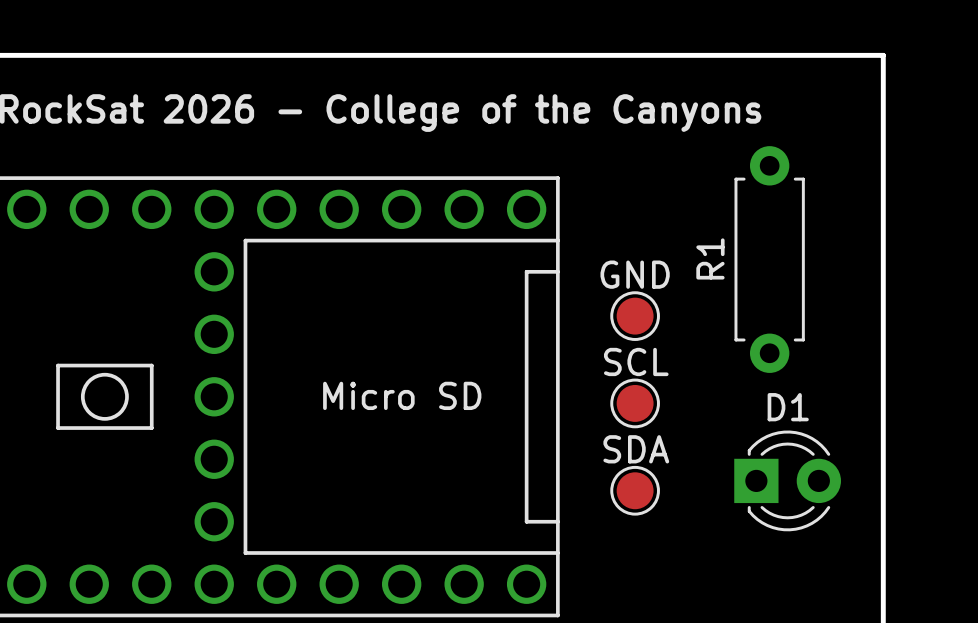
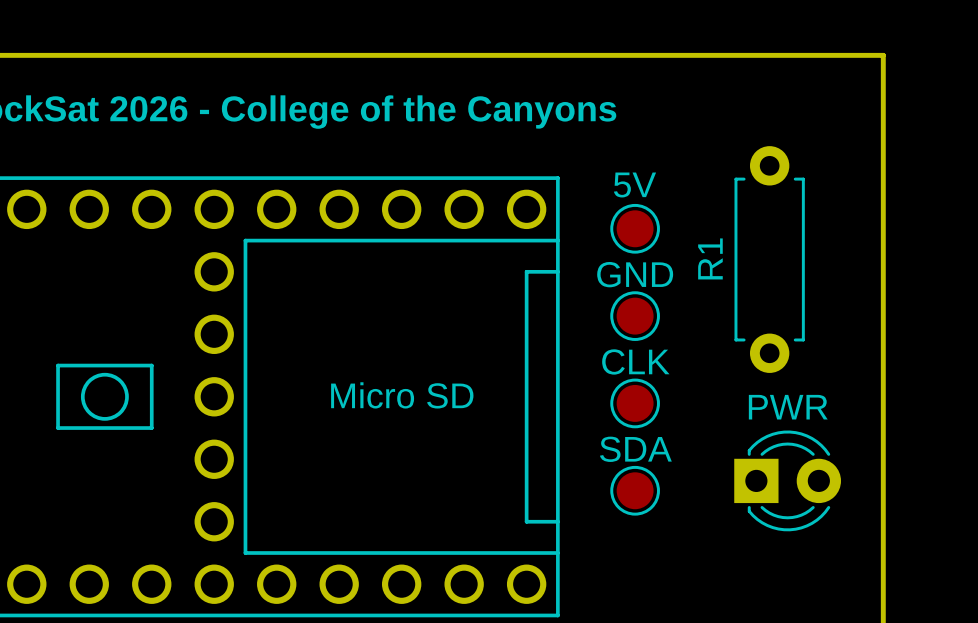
part: none -> 5V (635, 228)
SCL name: SCL (636, 361) -> CLK (635, 361)
D1 name: D1 (788, 407) -> PWR (788, 407)

